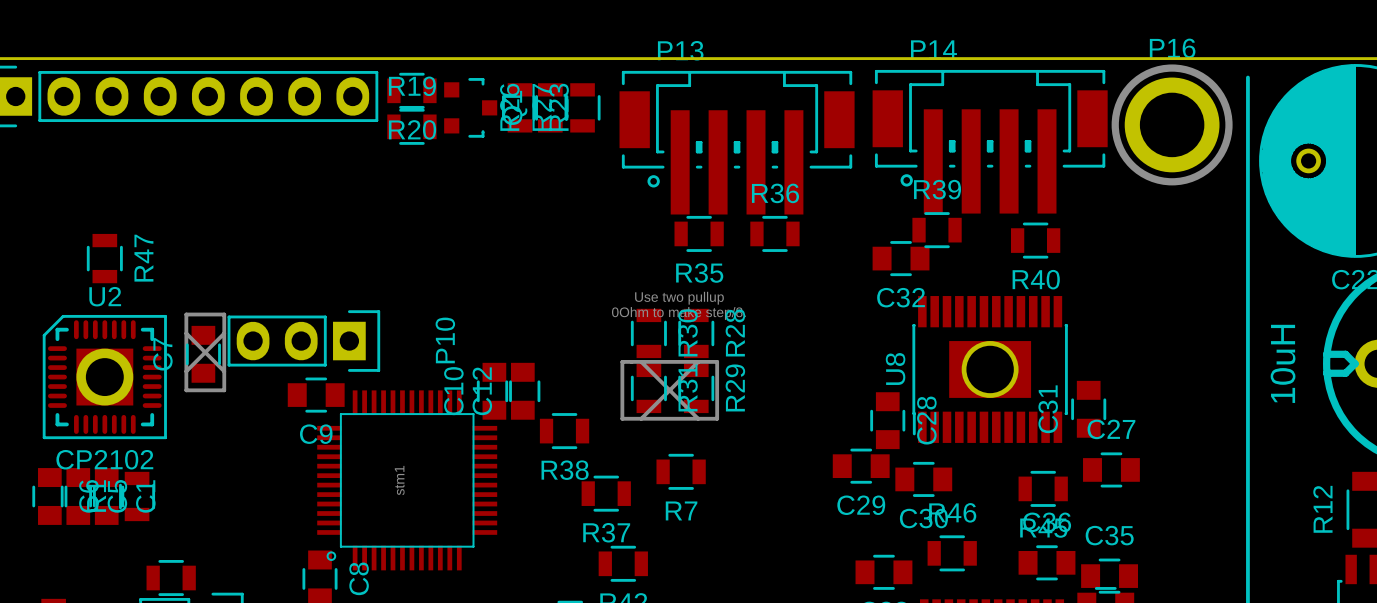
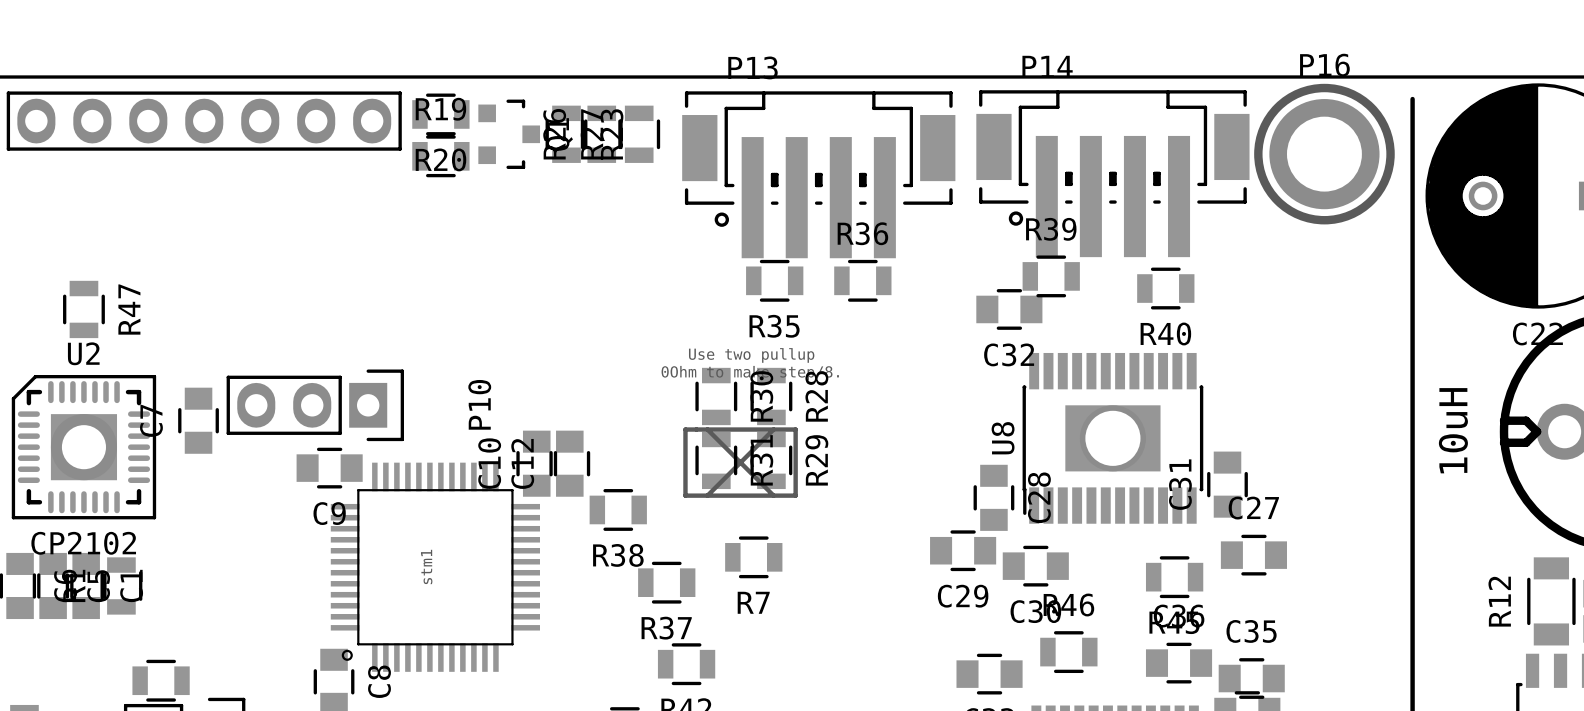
line: (186, 314) (224, 314) (224, 390) (186, 390) (186, 314) -> none
line: (186, 333) (224, 371) -> none
line: (224, 333) (186, 371) -> none

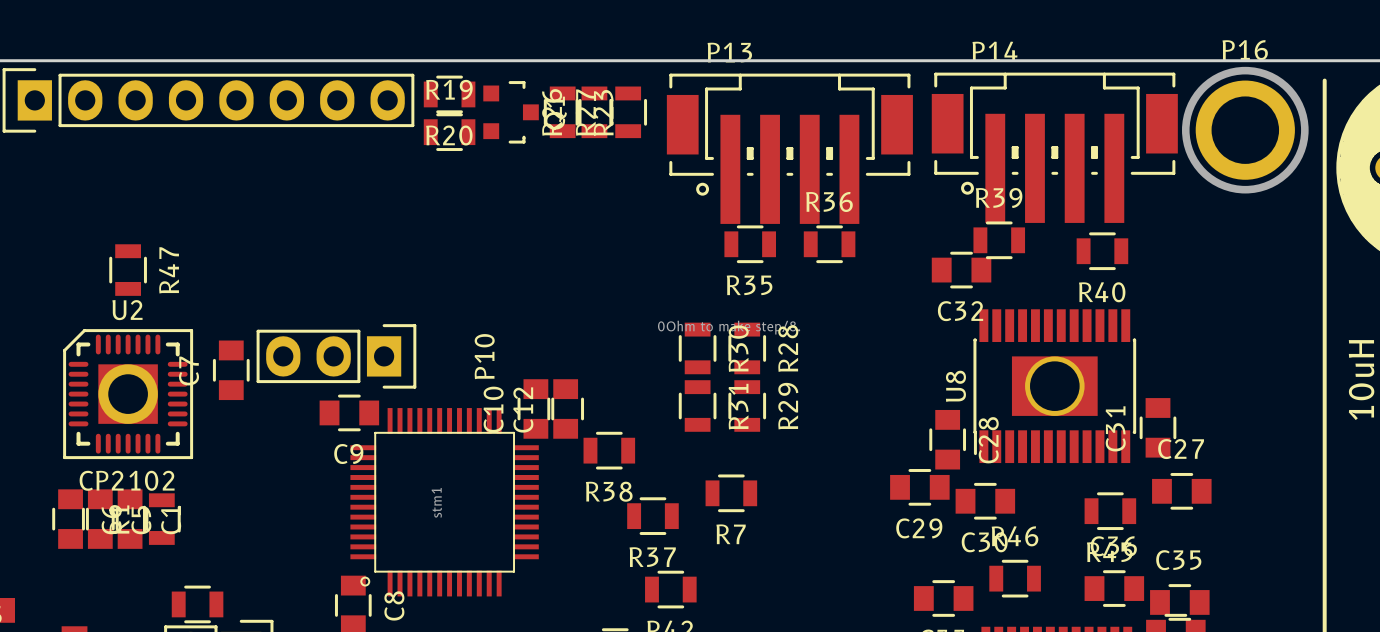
text: Use two pullup (751, 355) -> none
line: (685, 429) (795, 429) (795, 495) (685, 495) (685, 429) -> none
line: (707, 429) (773, 495) -> none
line: (773, 429) (707, 495) -> none

